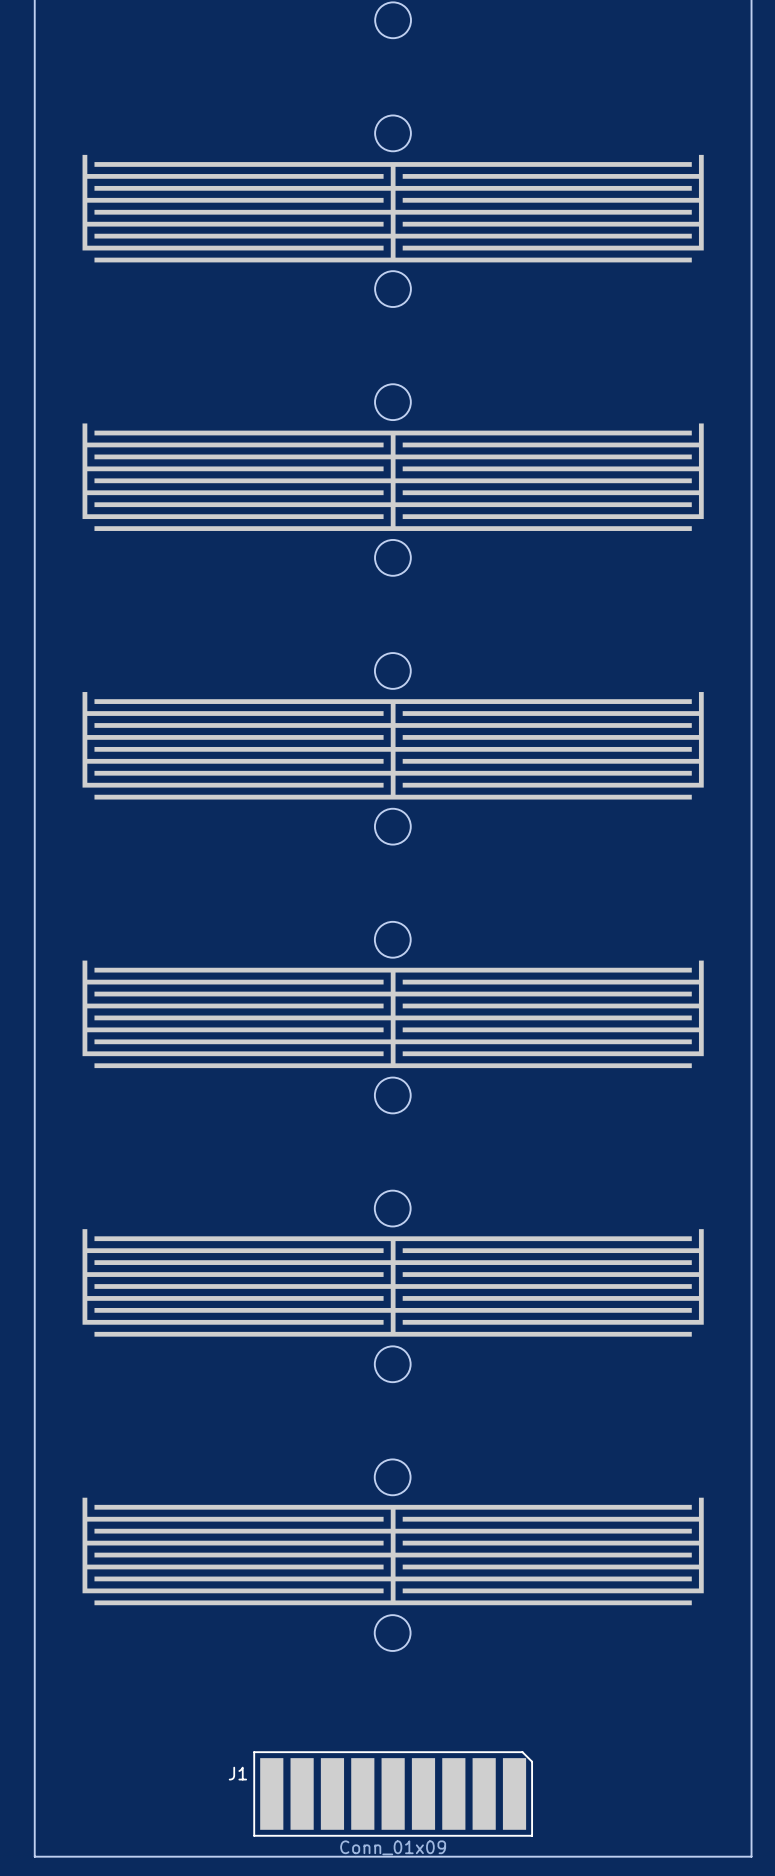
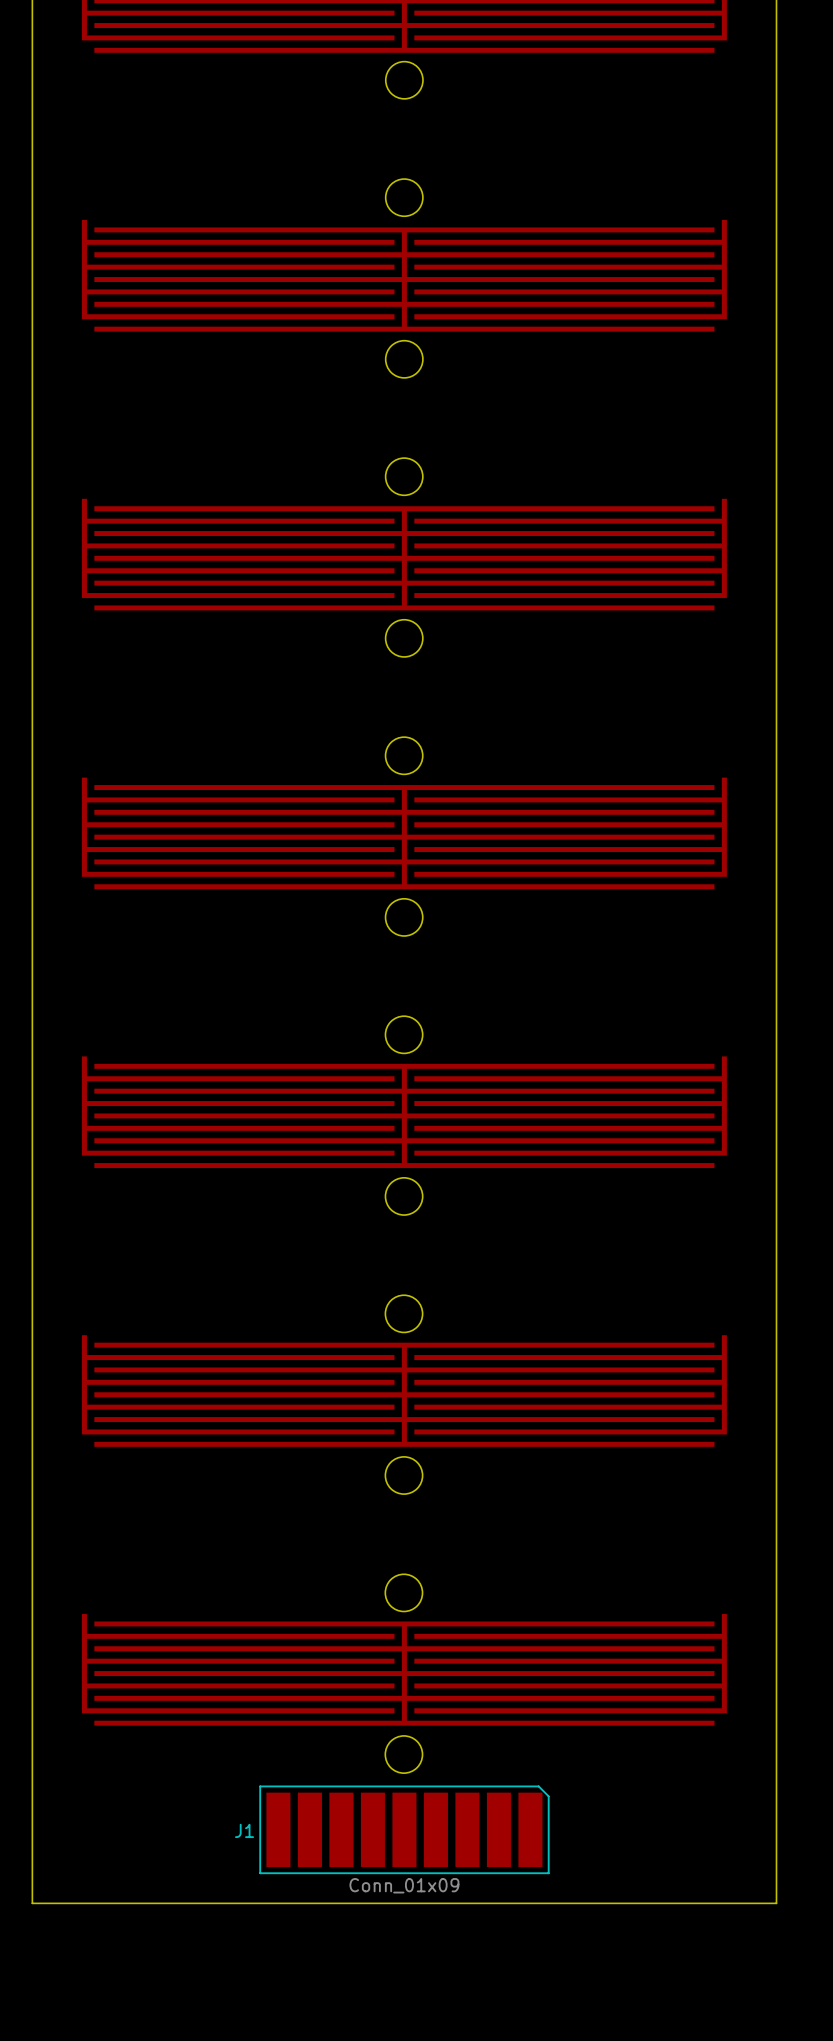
J1 name position: J1 (237, 1773) -> J1 (244, 1830)
board edge: (34, 1776) (34, 1856) (751, 1856) (751, 1776) -> (32, 1903) (776, 1903)
J1 position: (393, 1793) -> (404, 1829)

